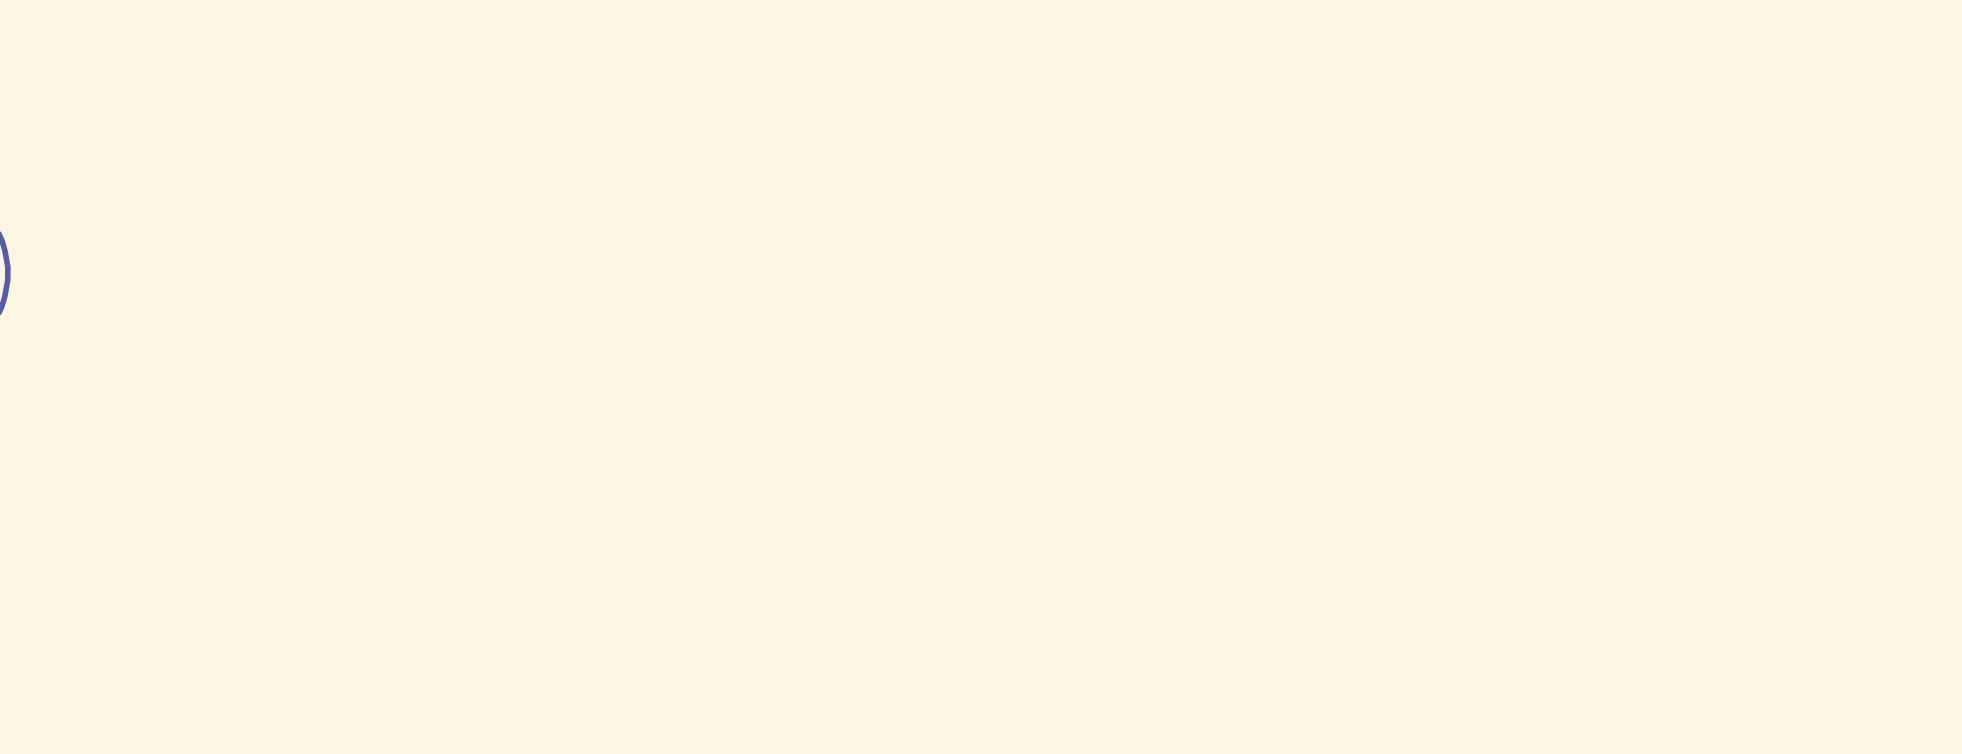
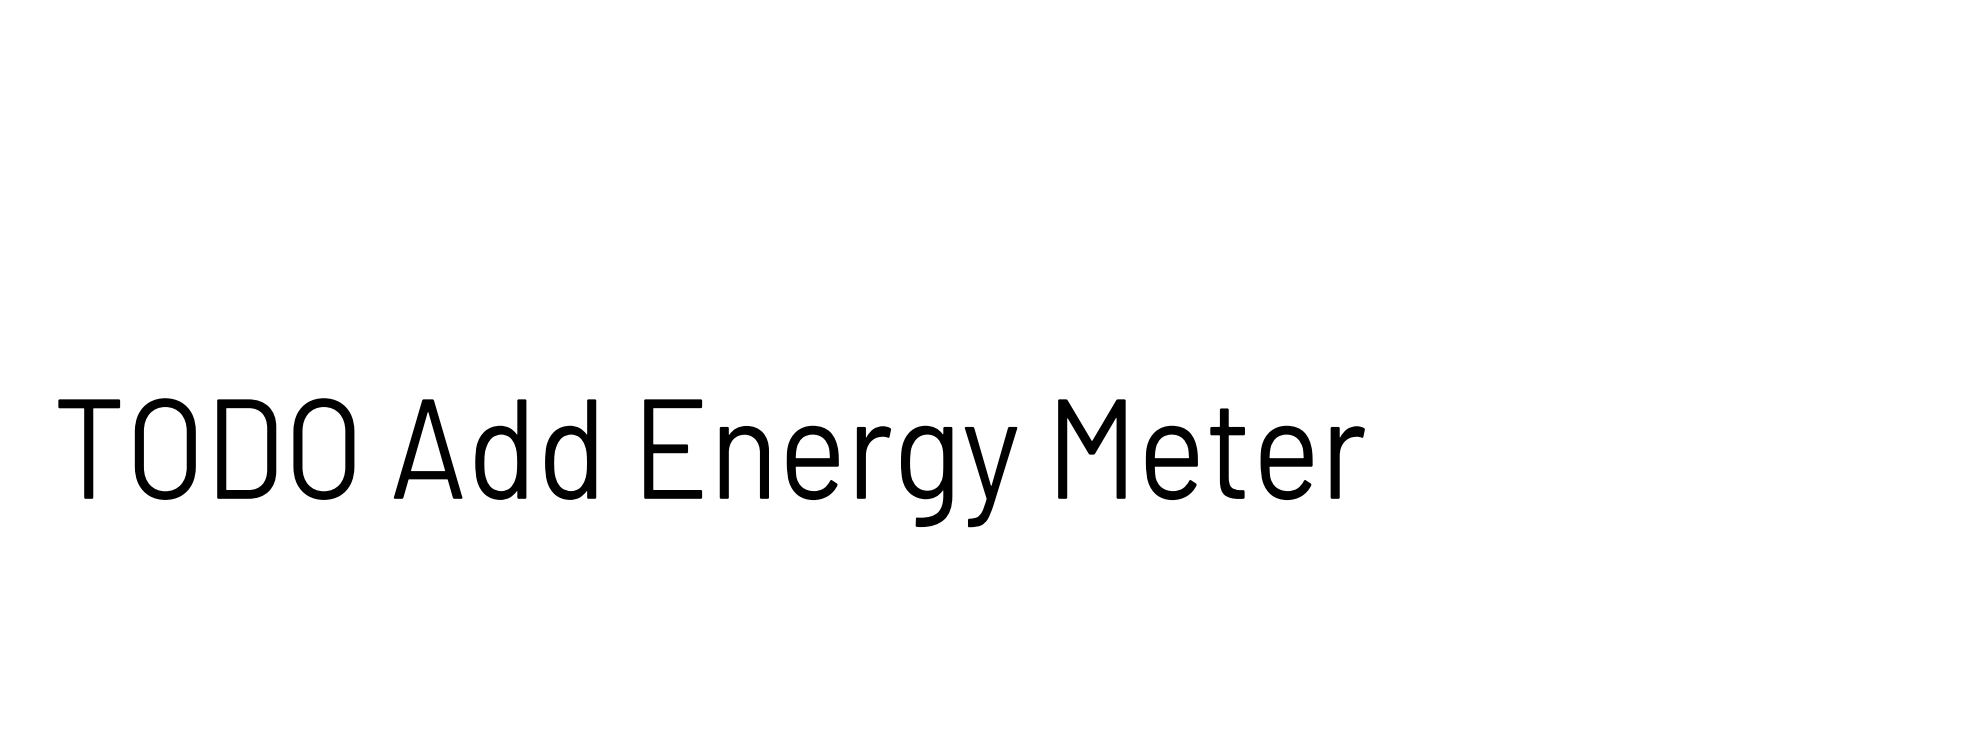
text: none -> TODO Add Energy Meter (711, 462)

